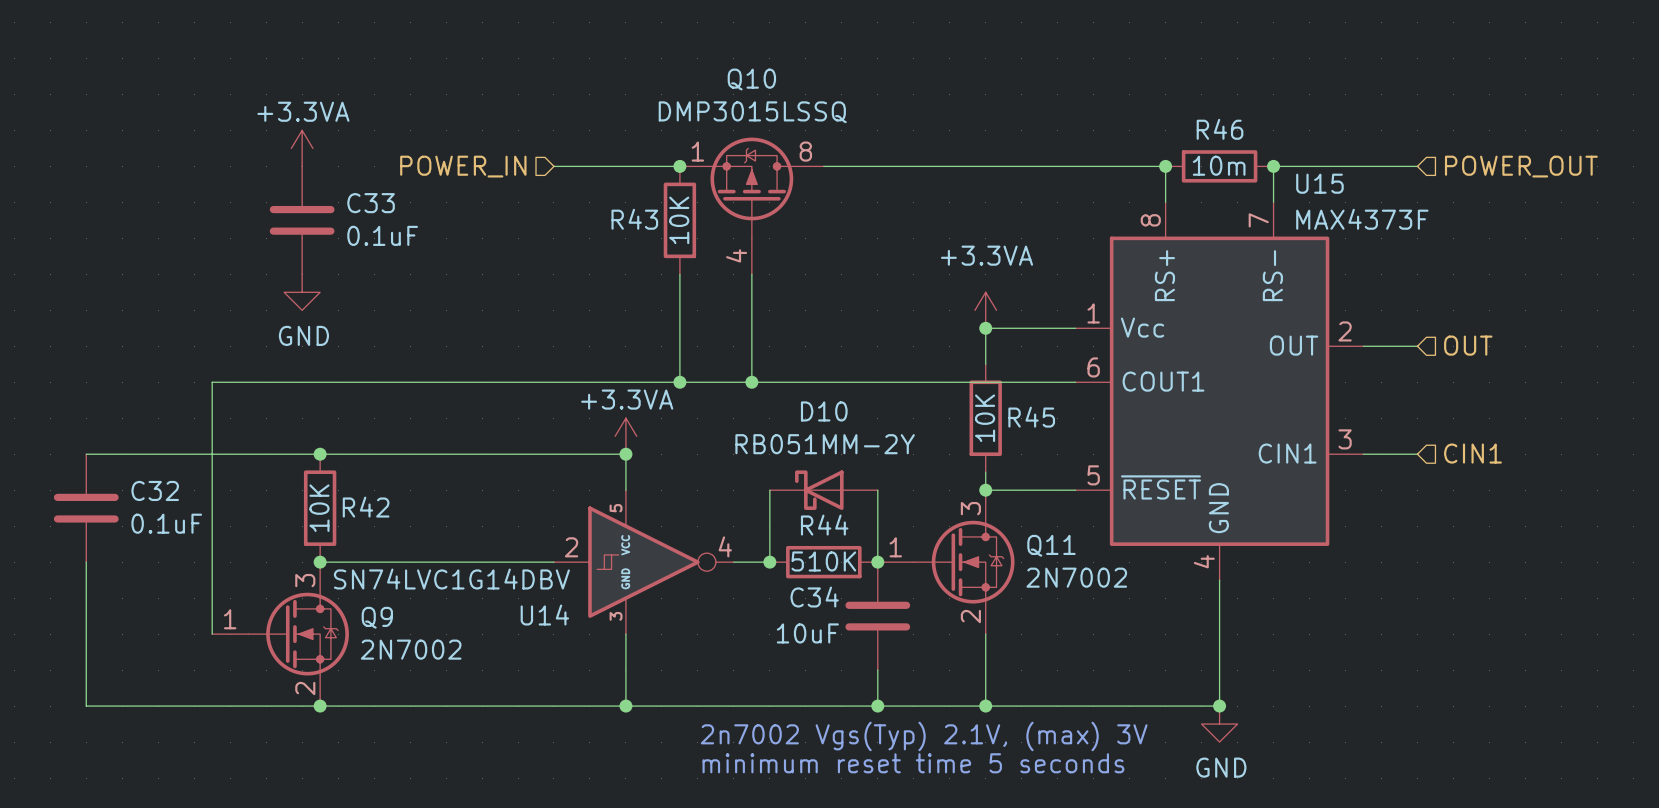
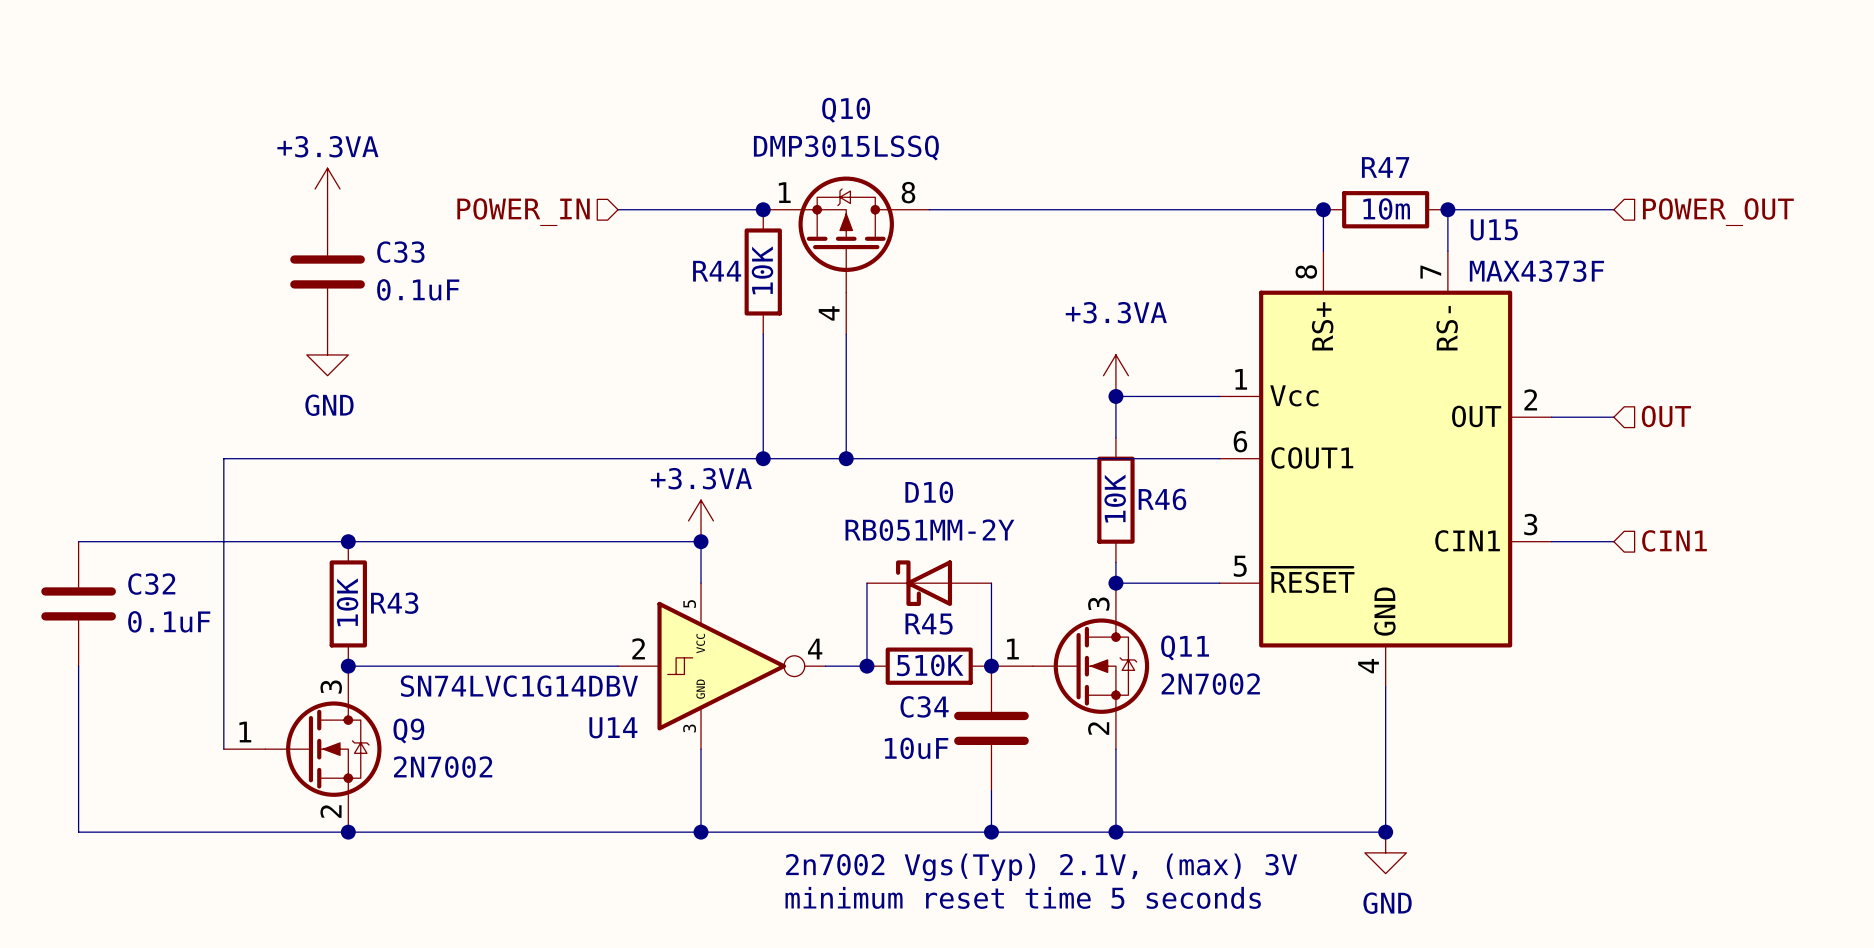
R46 name: R46 (1220, 129) -> R47 (1385, 167)
R43 name: R43 (634, 219) -> R44 (717, 271)
R45 name: R45 (1031, 417) -> R46 (1162, 499)
R42 name: R42 (366, 507) -> R43 (394, 603)
R44 name: R44 (824, 525) -> R45 (929, 624)

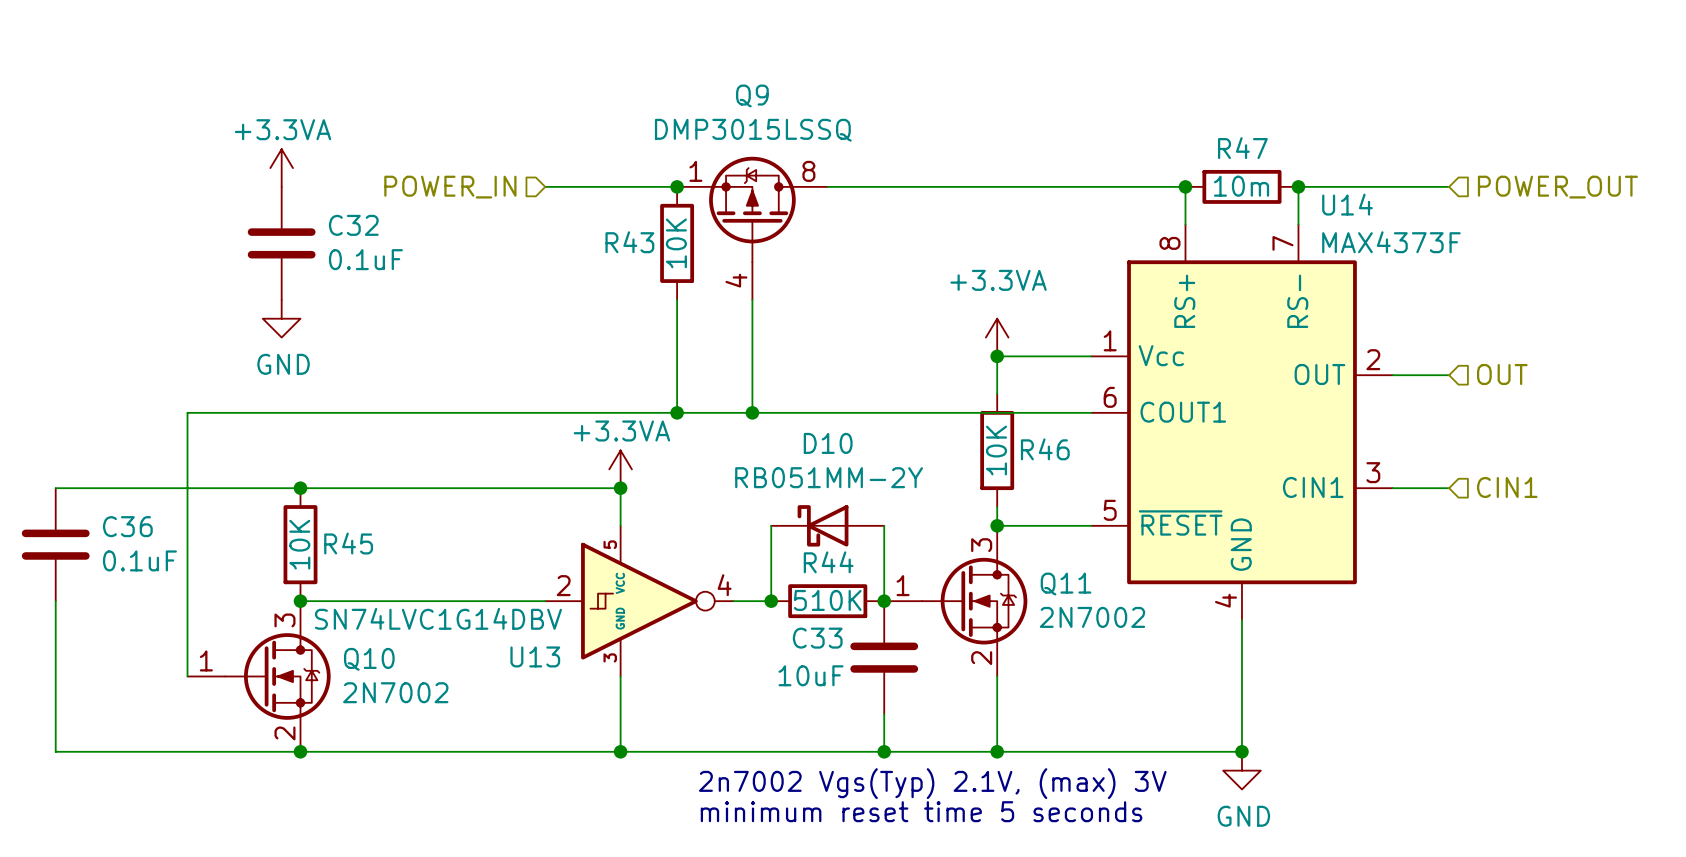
Q10 name: Q10 (846, 110) -> Q9 (752, 95)
U15 name: U15 (1494, 229) -> U14 (1347, 204)
C33 name: C33 (400, 252) -> C32 (353, 225)
R44 name: R44 (717, 271) -> R43 (629, 242)
C32 name: C32 (151, 584) -> C36 (127, 526)
R43 name: R43 (394, 603) -> R45 (348, 543)
R45 name: R45 (929, 624) -> R44 (828, 562)
C34 name: C34 (924, 706) -> C33 (817, 638)
U14 name: U14 (613, 727) -> U13 (535, 656)
Q9 name: Q9 (408, 730) -> Q10 (369, 659)

